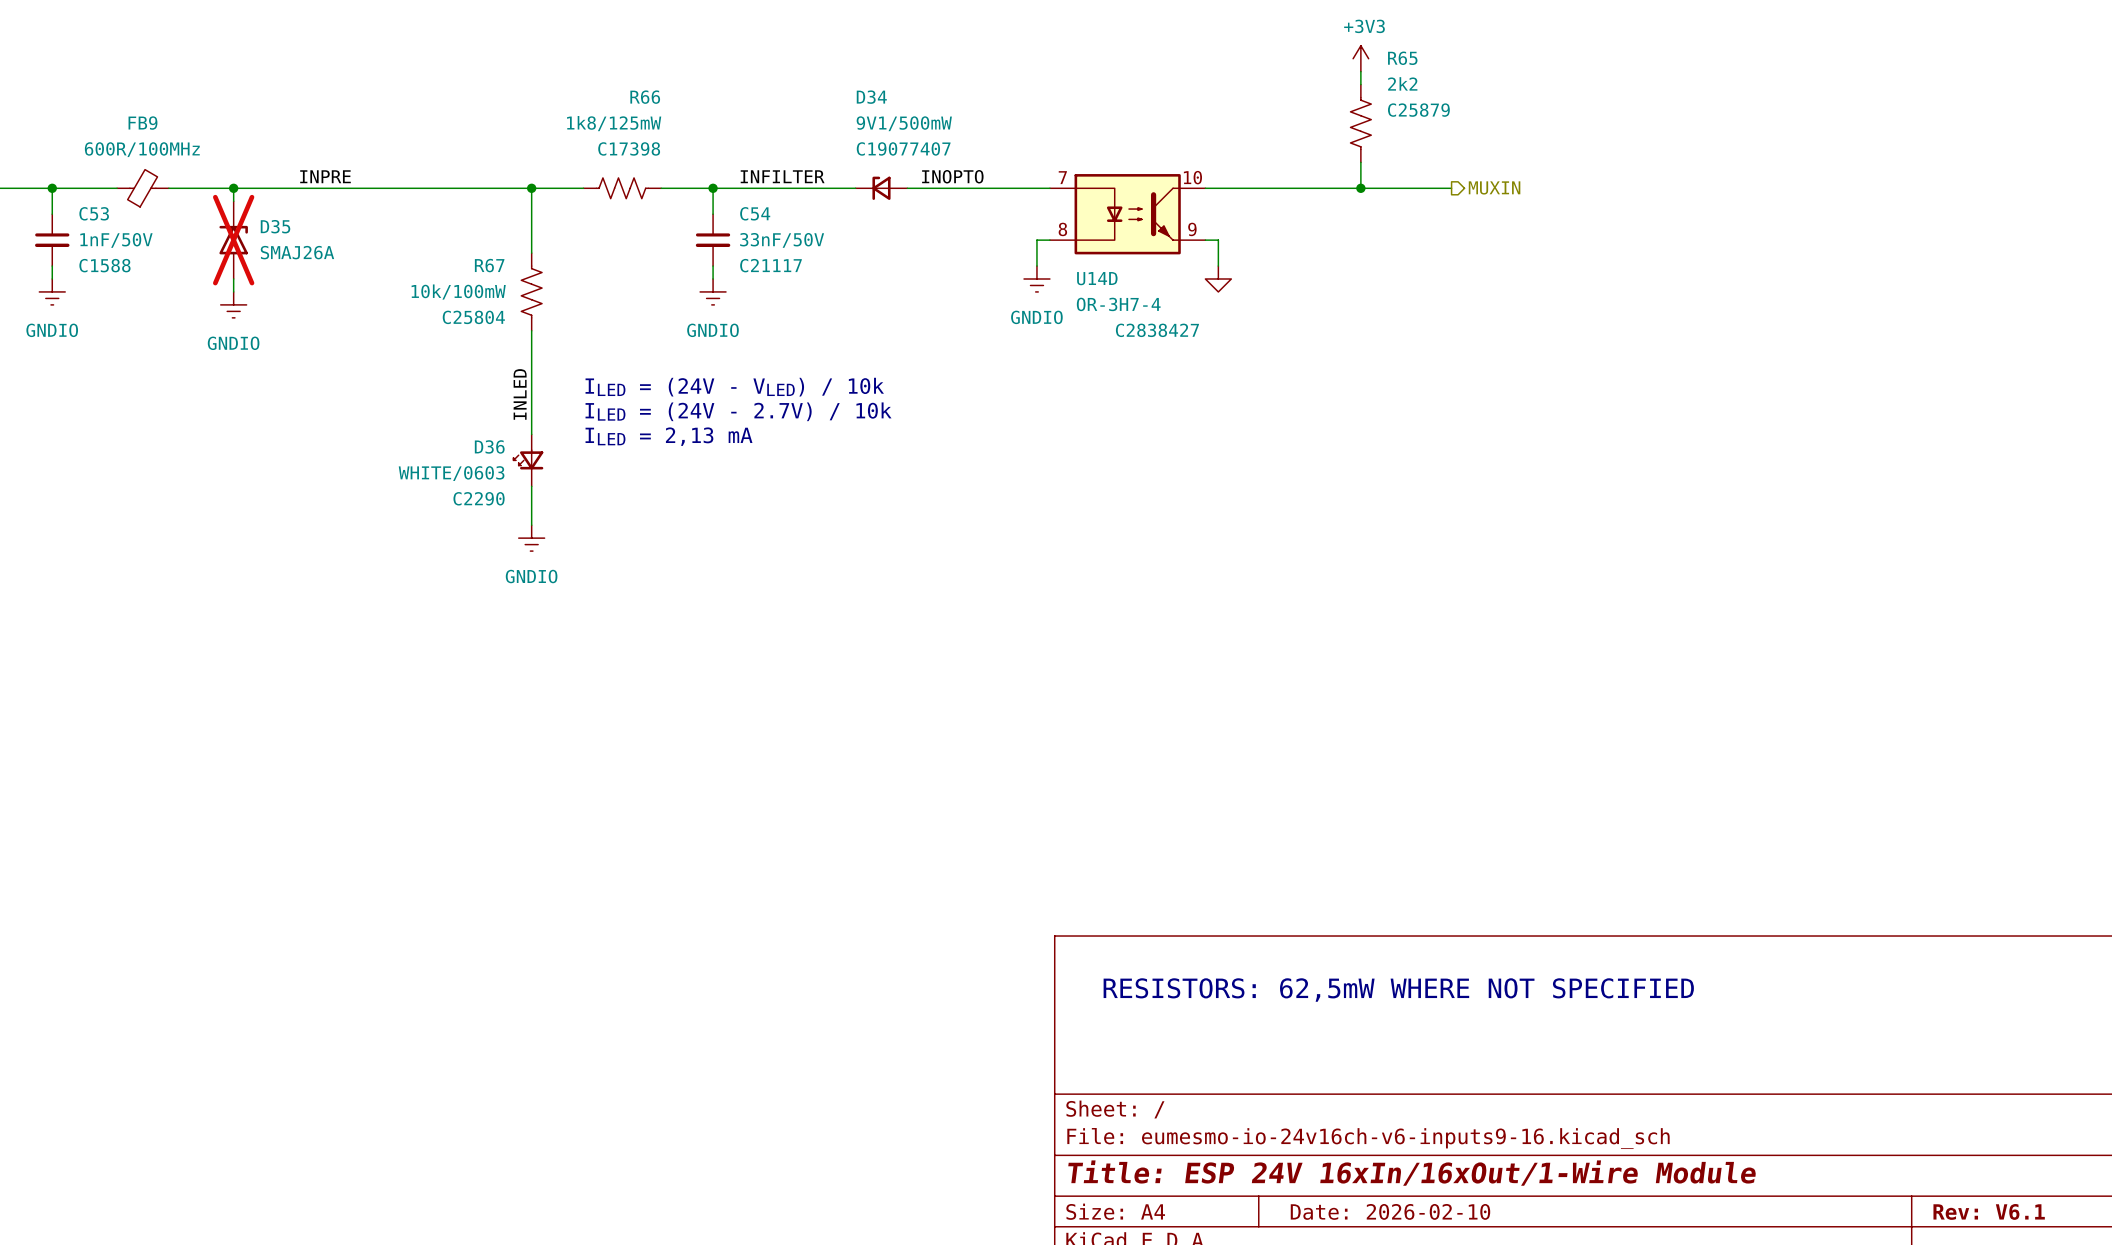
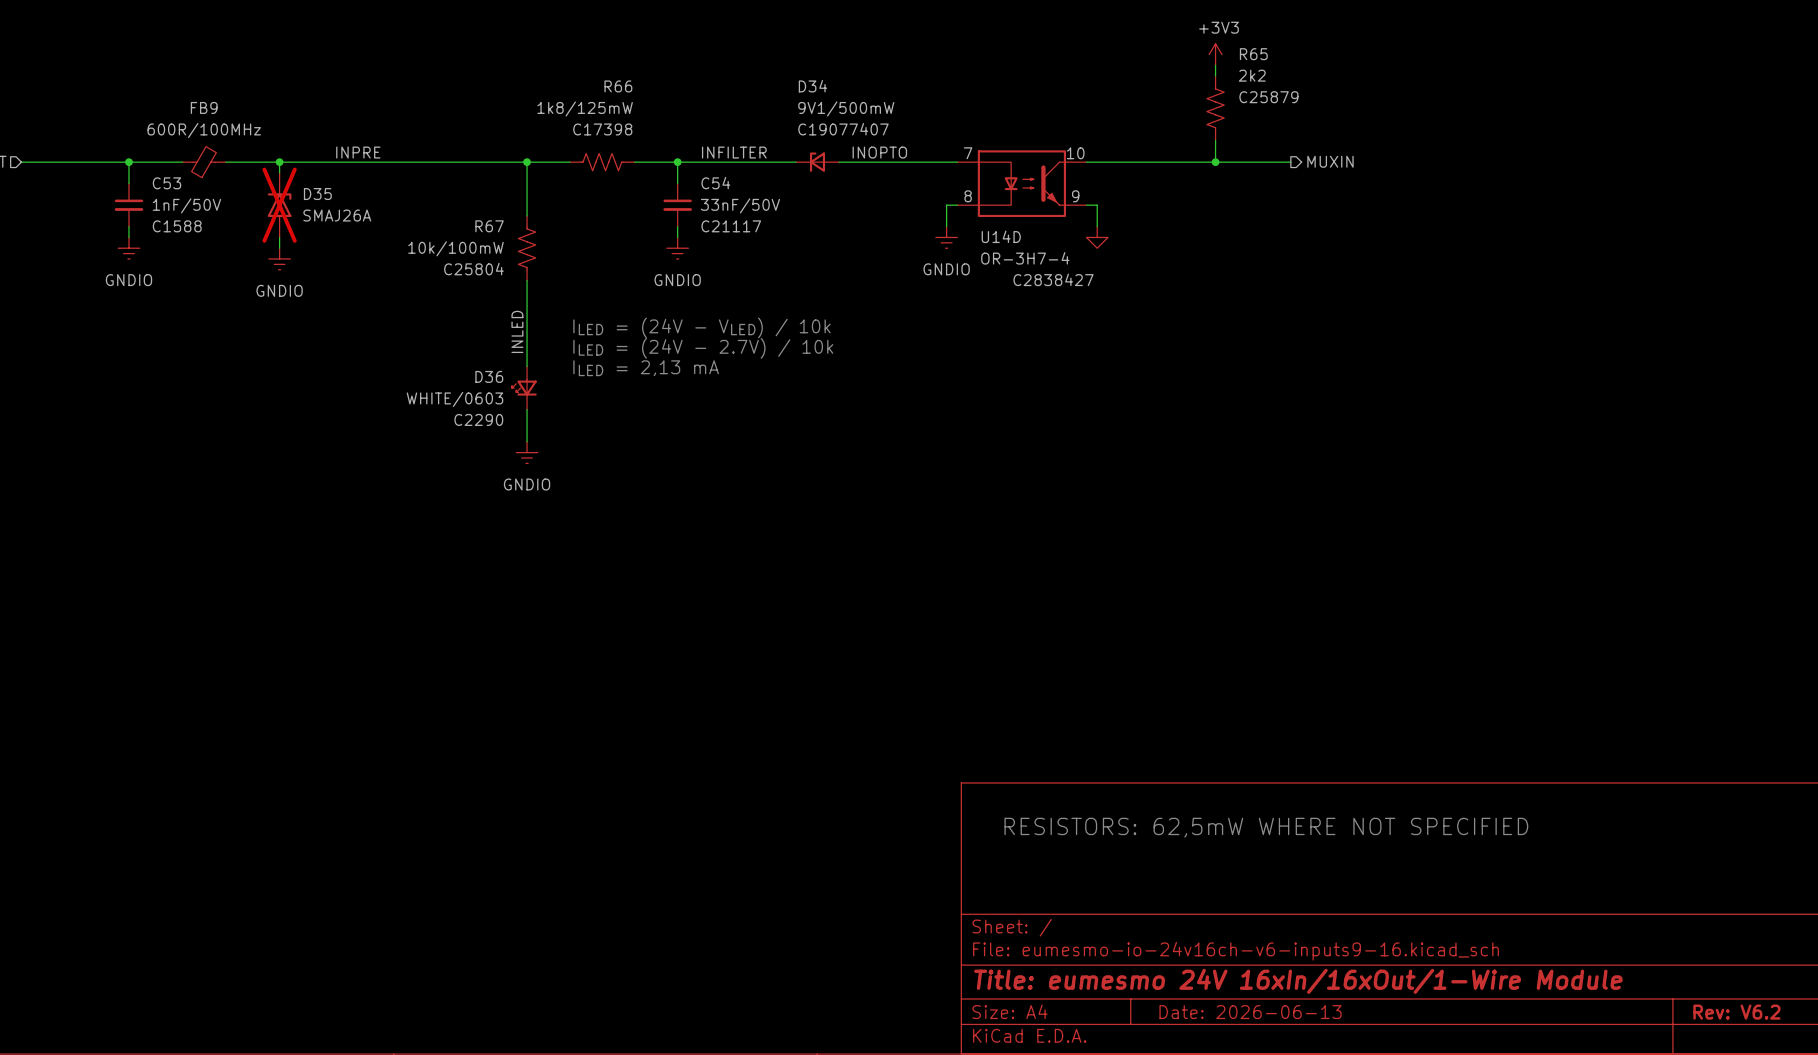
title block: Title: ESP 24V 16xIn/16xOut/1-Wire Module (1412, 1173) -> Title: eumesmo 24V 16xIn/16xOut/1-Wire Module (1298, 981)
title block: Date: 2026-02-10 (1390, 1211) -> Date: 2026-06-13 (1250, 1012)
title block: Rev: V6.1 (1989, 1211) -> Rev: V6.2 (1736, 1012)

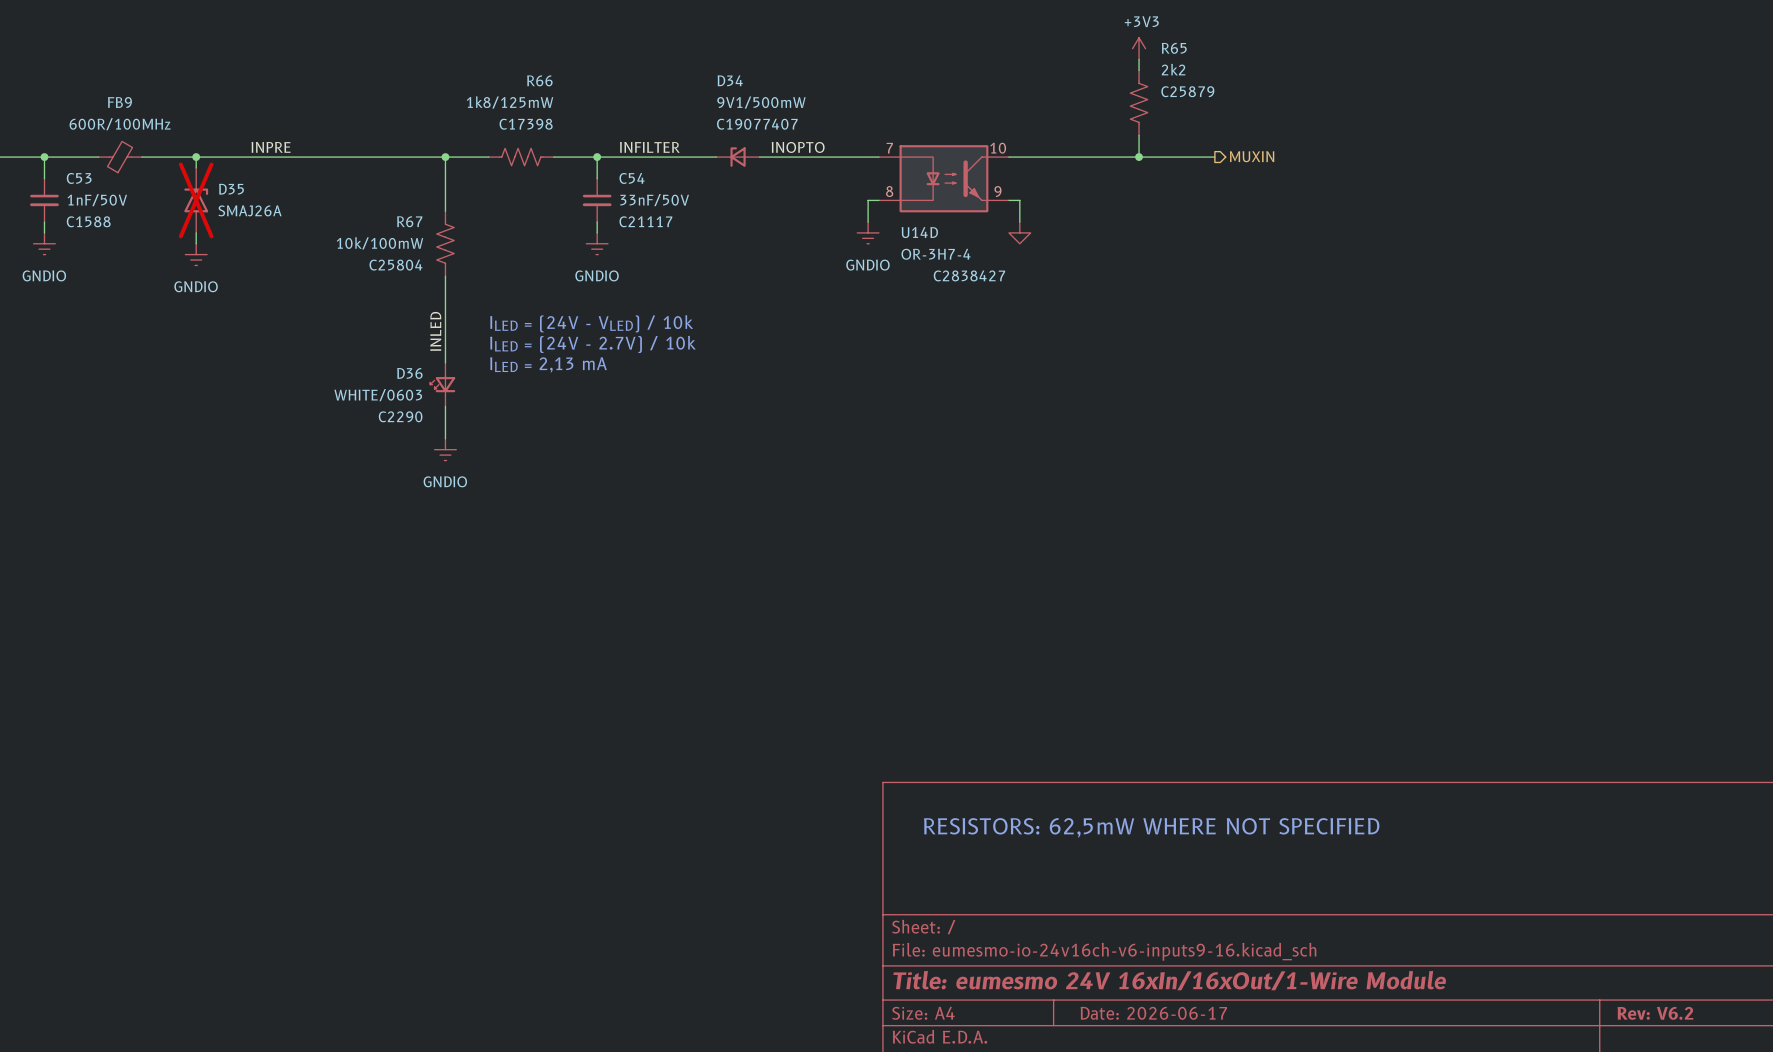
title block: Date: 2026-06-13 (1250, 1012) -> Date: 2026-06-17 (1153, 1013)

